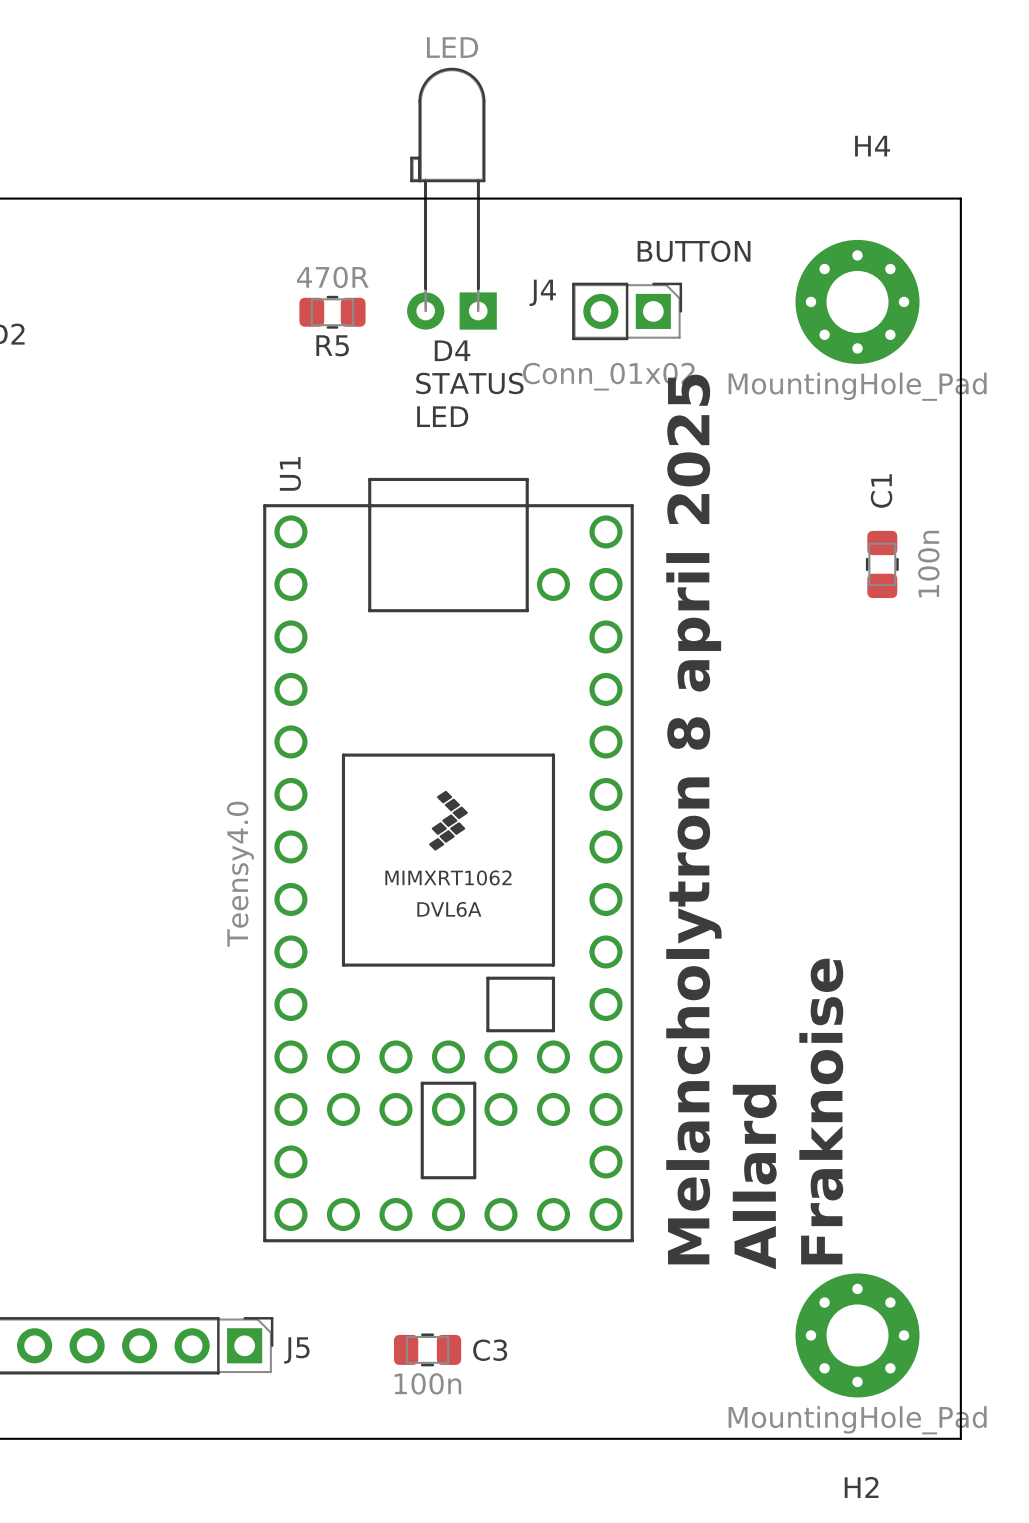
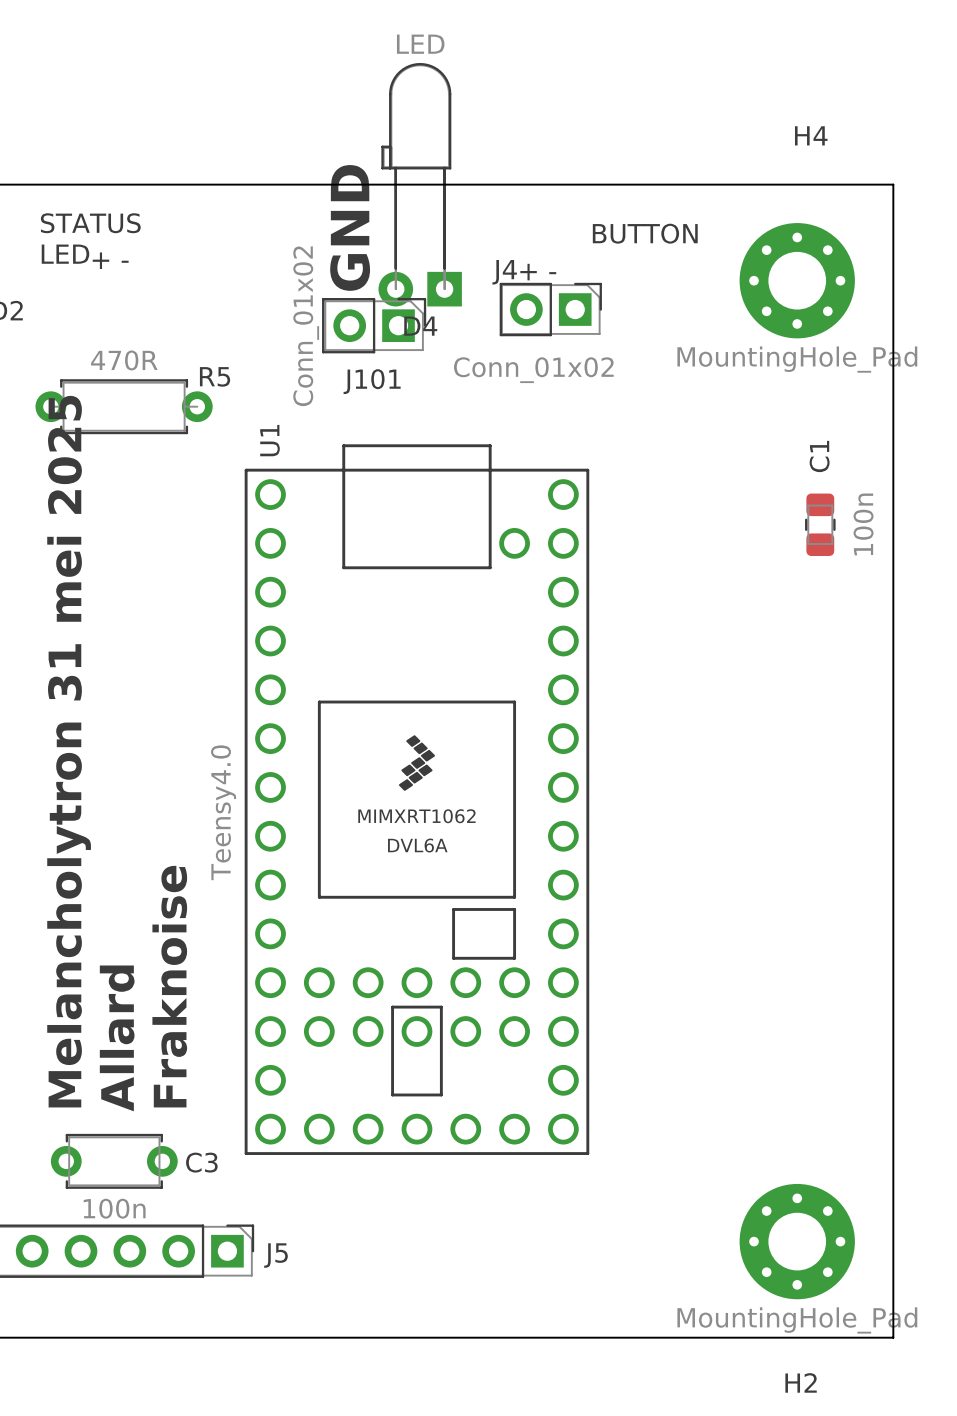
text: none -> GND (350, 227)
text: none -> + - (110, 260)
text: none -> + - (538, 272)
R5 footprint: [299, 295, 366, 329] -> [35, 379, 213, 435]
J4 position: (627, 311) -> (550, 309)
R5 name position: R5 (332, 345) -> R5 (215, 376)
J101: none -> Conn_01x02 (374, 325)
text position: STATUS (469, 383) -> STATUS (90, 223)
text position: LED (442, 416) -> LED (65, 254)
text: none -> Melancholytron 31 mei 2025 (69, 751)
text: Melancholytron 8 april 2025 (693, 819) -> none
text: none -> Fraknoise (169, 986)
text: Fraknoise (821, 1111) -> none
text: none -> Allard (117, 1038)
text: Allard (754, 1177) -> none
C3 footprint: [393, 1333, 462, 1367] -> [50, 1133, 178, 1189]

